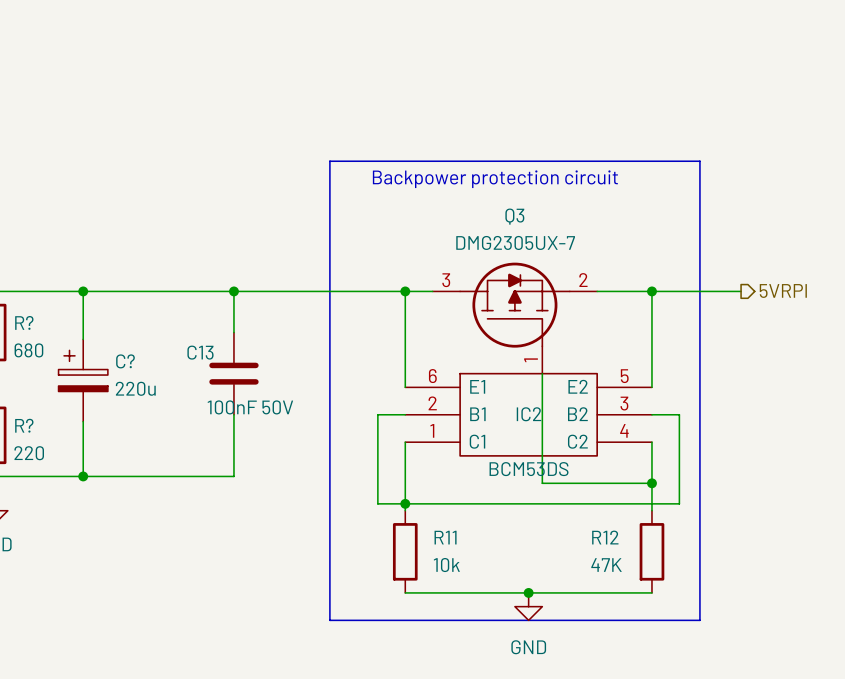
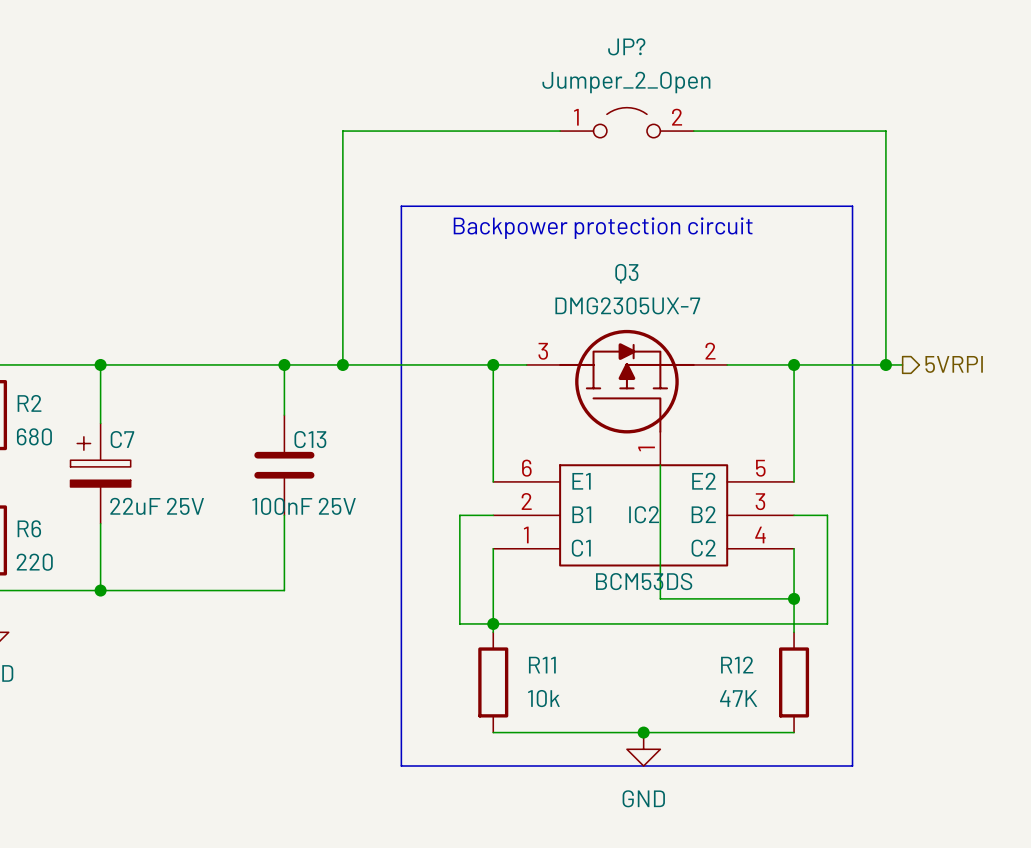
JP?: none -> Jumper_2_Open (626, 122)
wire: none -> (560, 131) (342, 131) (342, 364)
wire: none -> (693, 131) (885, 131) (885, 364)
junction: none -> (342, 364)
junction: none -> (885, 364)
R? name: R? (24, 322) -> R2 (29, 403)
C13 name position: C13 (200, 352) -> C13 (310, 439)
C? name: C? (125, 361) -> C7 (122, 439)
C? value: 220u (135, 388) -> 22uF 25V (157, 506)
C13 value: 100nF 50V (250, 407) -> 100nF 25V (304, 506)
R? name: R? (24, 425) -> R6 (29, 528)

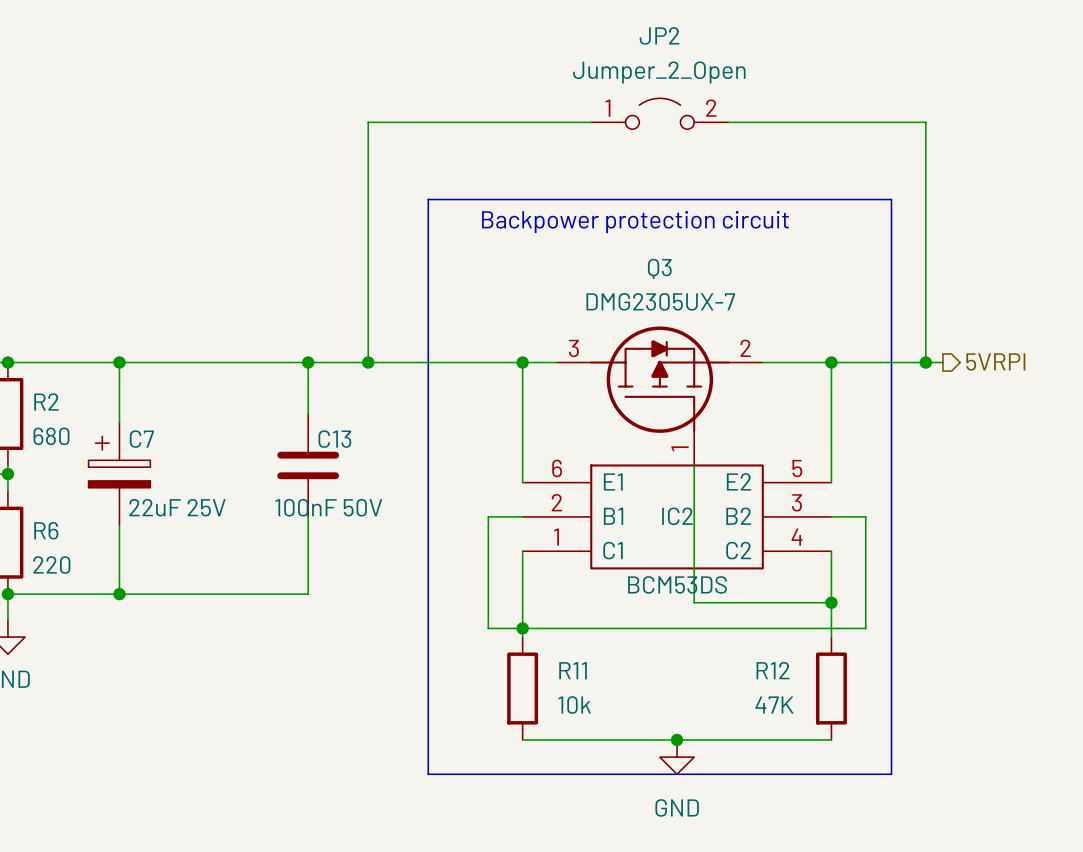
JP? name: JP? (626, 46) -> JP2 (659, 35)
C13 value: 100nF 25V (304, 506) -> 100nF 50V (328, 507)

